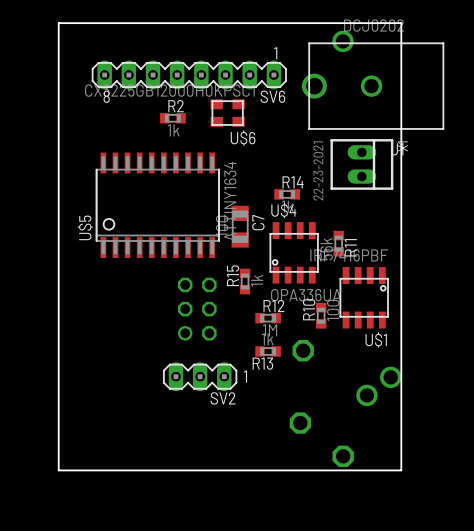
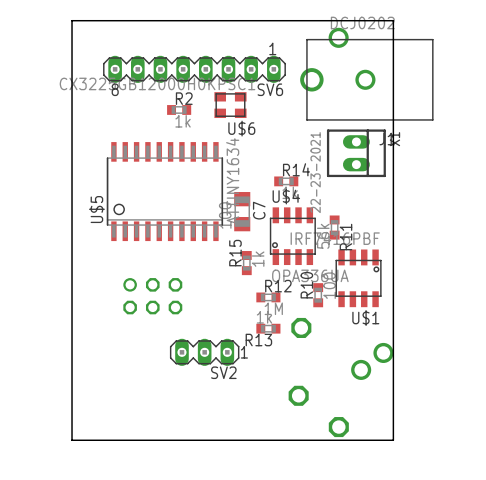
part rotation: 0° (197, 309) -> 90° clockwise (152, 296)
part position: (197, 309) -> (152, 296)

